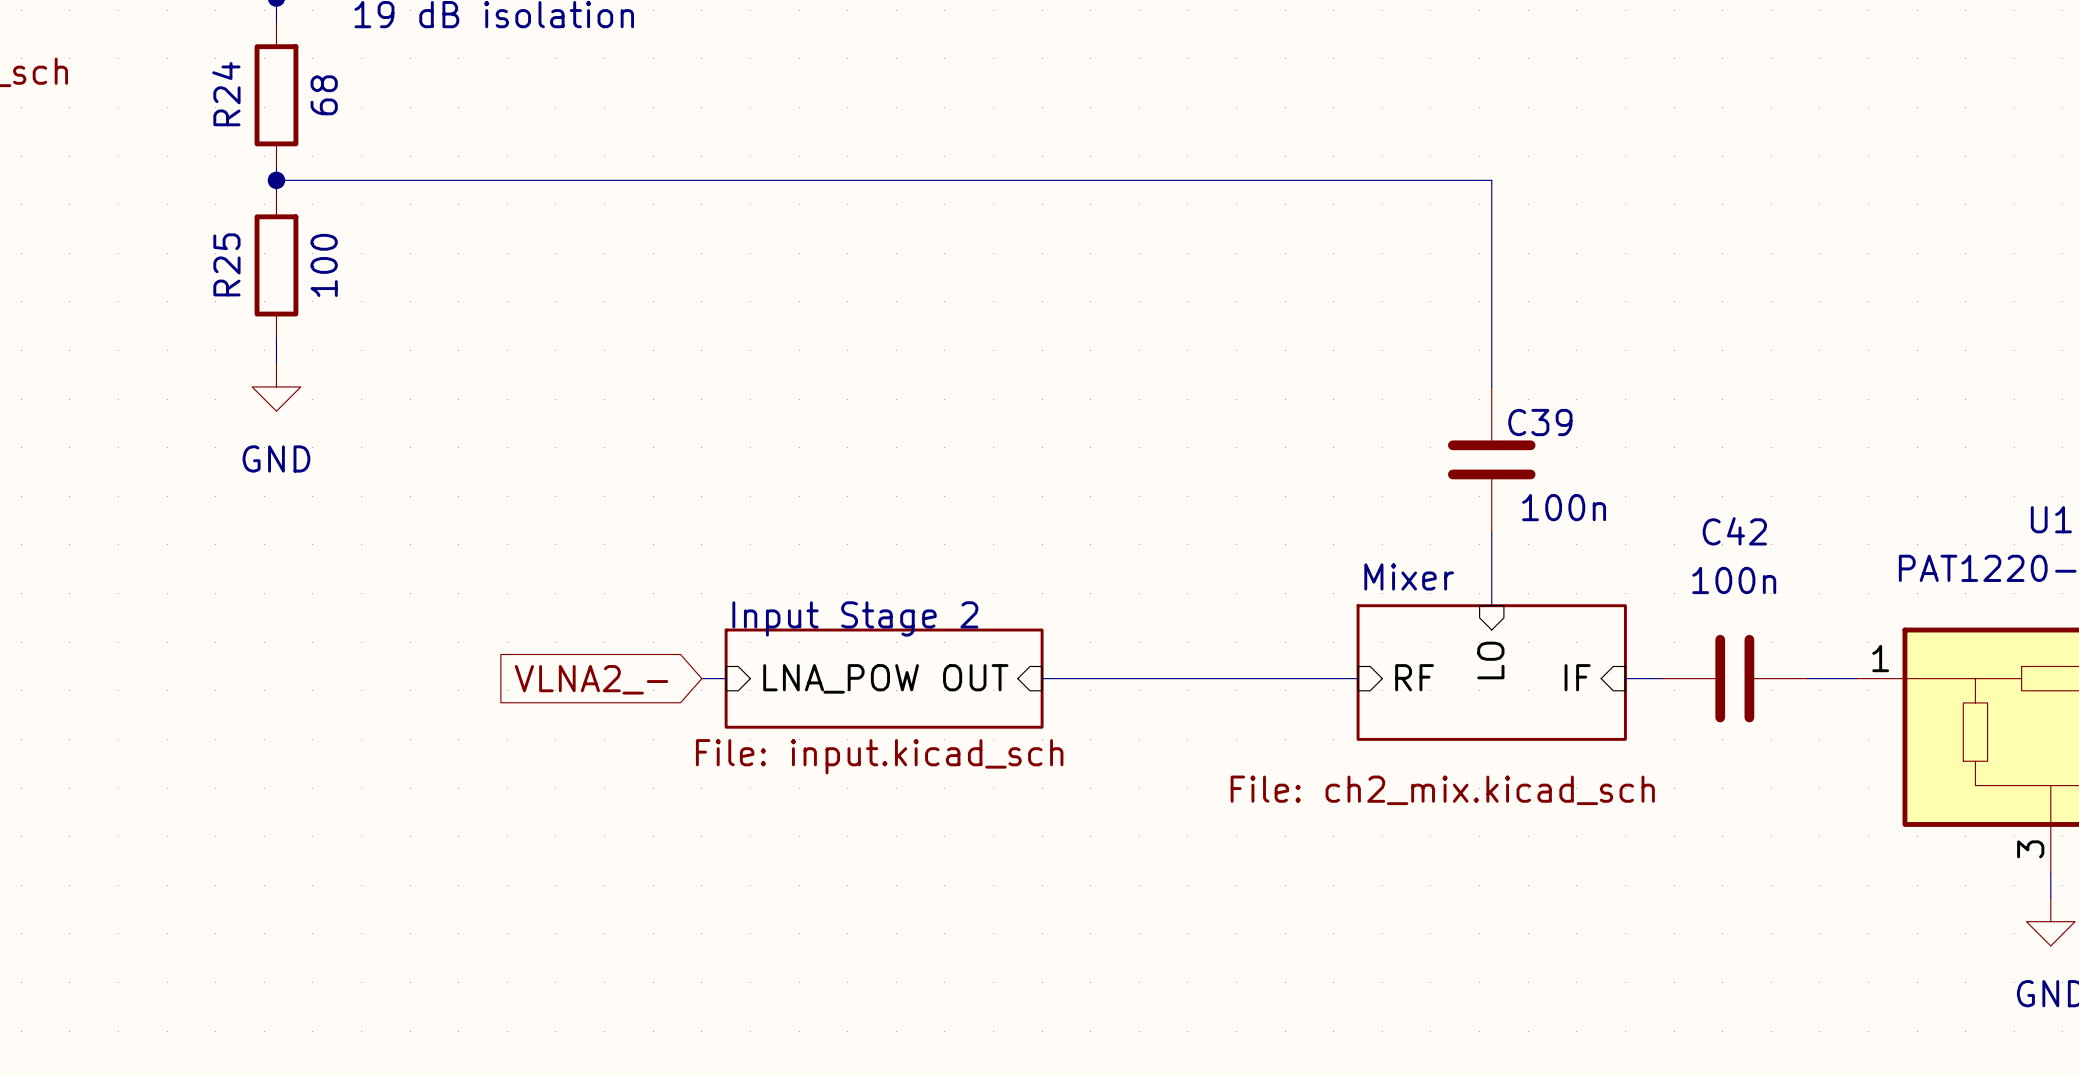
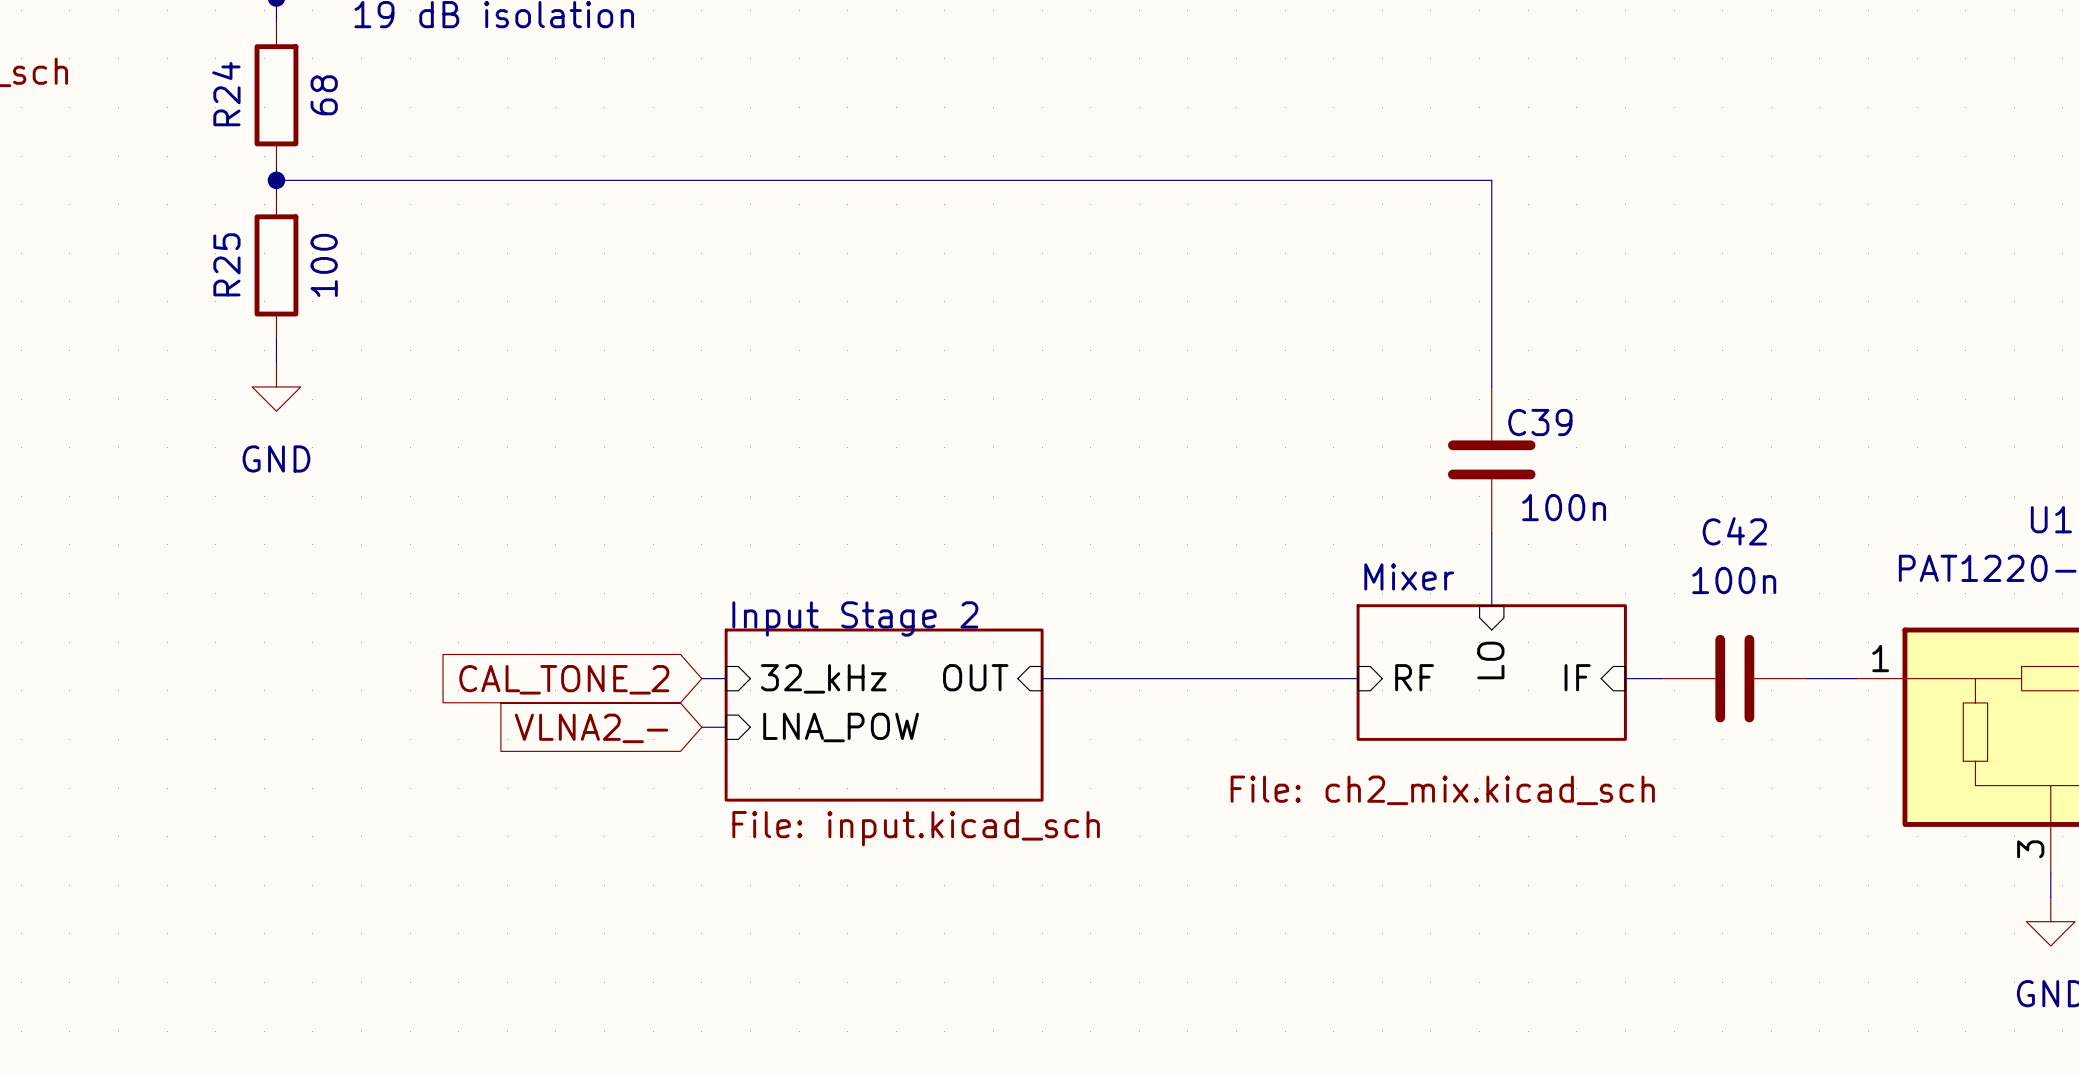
sheet Input Stage 2 shape: [724, 628, 1044, 729] -> [724, 628, 1044, 802]
sheet pin: LNA_POW (841, 678) -> 32_kHz (823, 678)
global label: VLNA2_- (591, 679) -> CAL_TONE_2 (564, 679)
wire: none -> (701, 727) (726, 727)
sheet pin: none -> LNA_POW (841, 727)
global label: none -> VLNA2_- (591, 728)
sheet Input Stage 2 value position: File: input.kicad_sch (879, 756) -> File: input.kicad_sch (916, 828)

